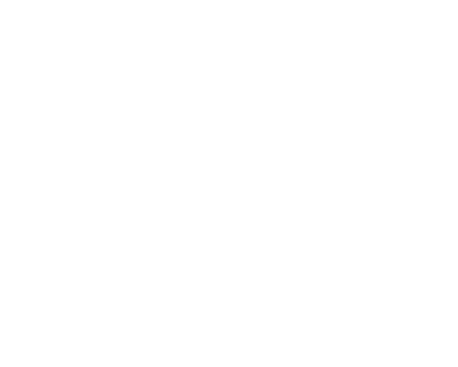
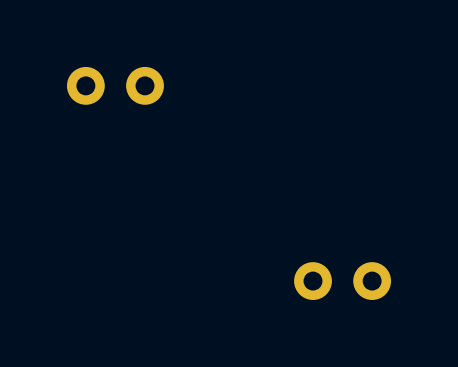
part: none -> (115, 85)
part: none -> (342, 281)

